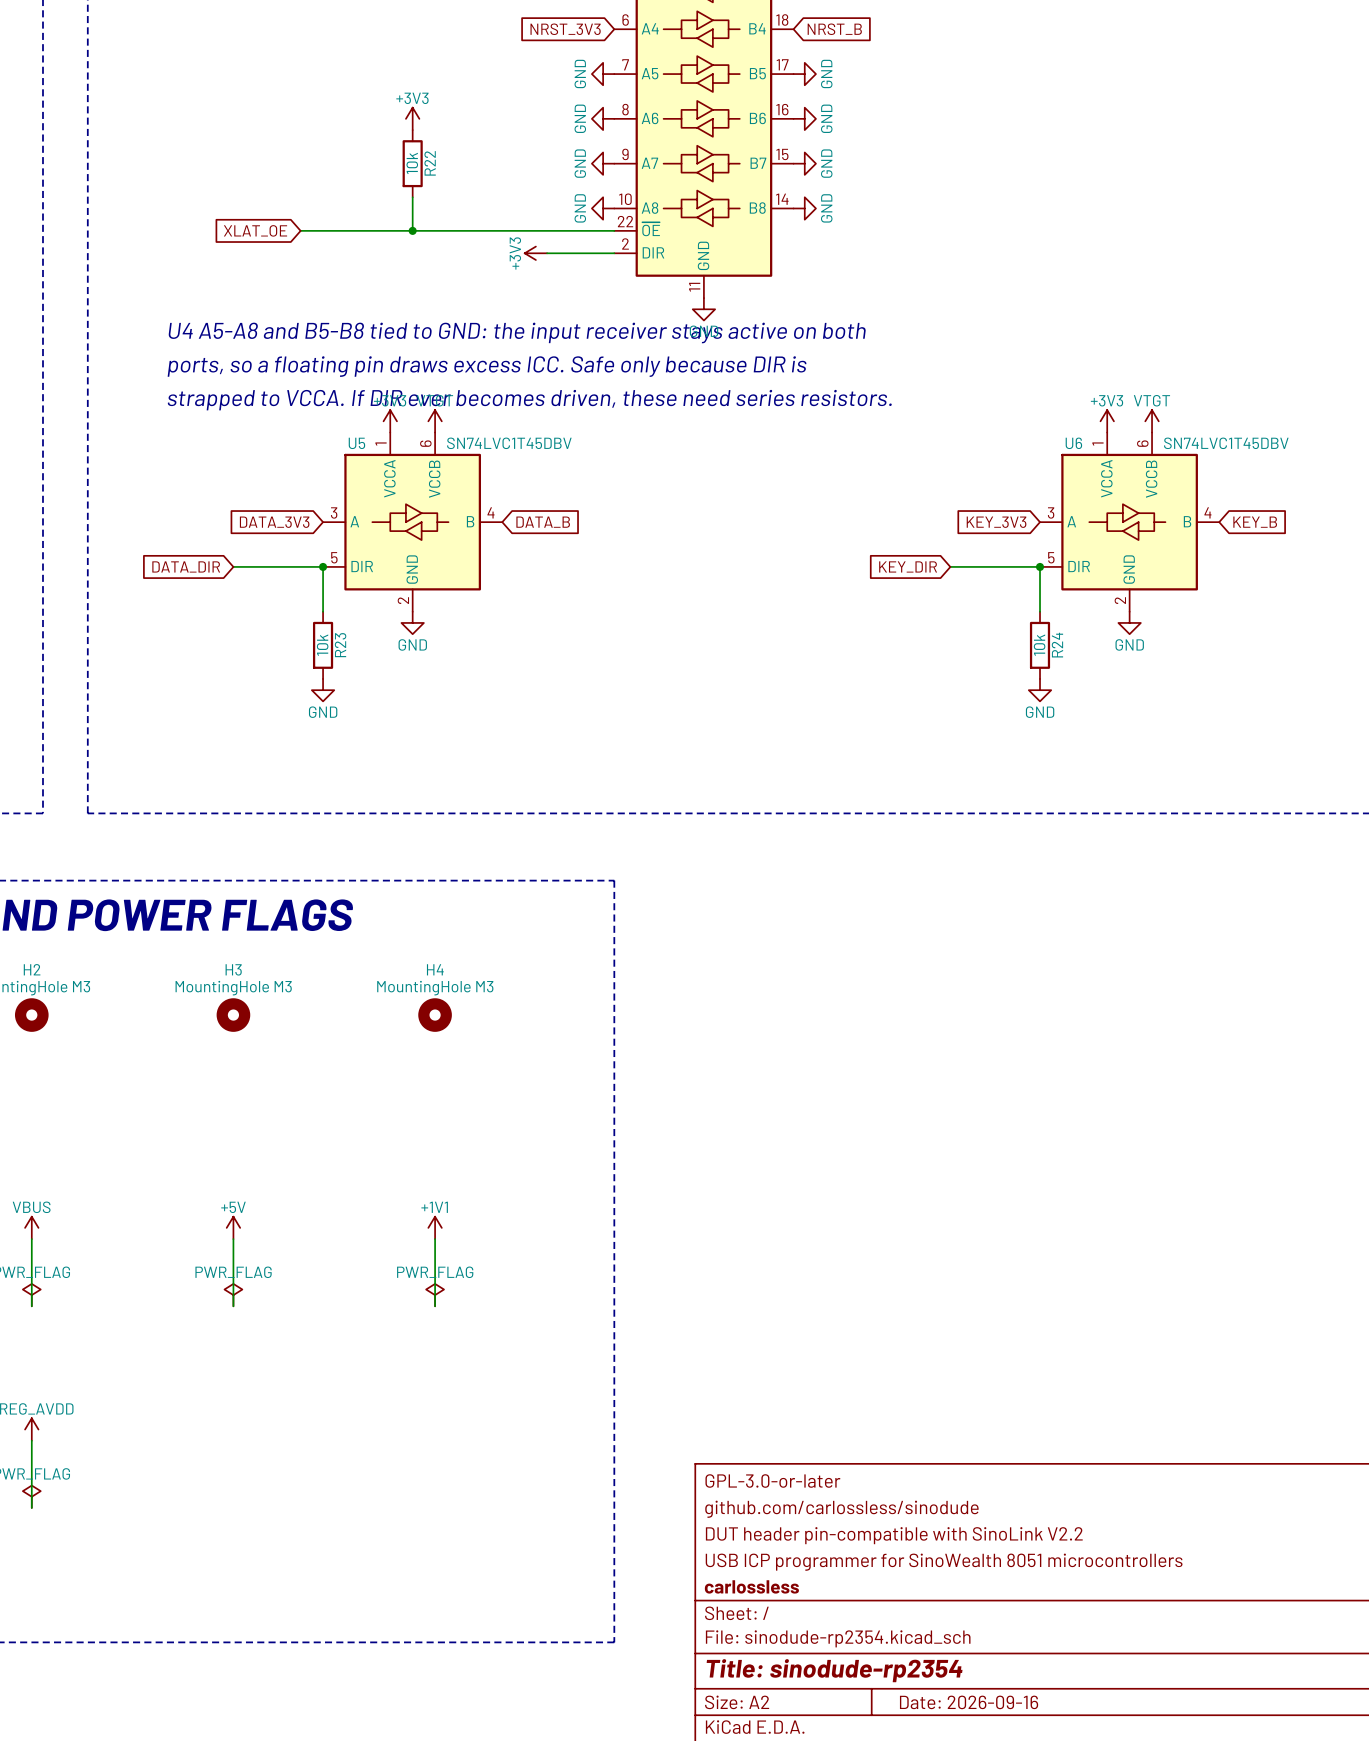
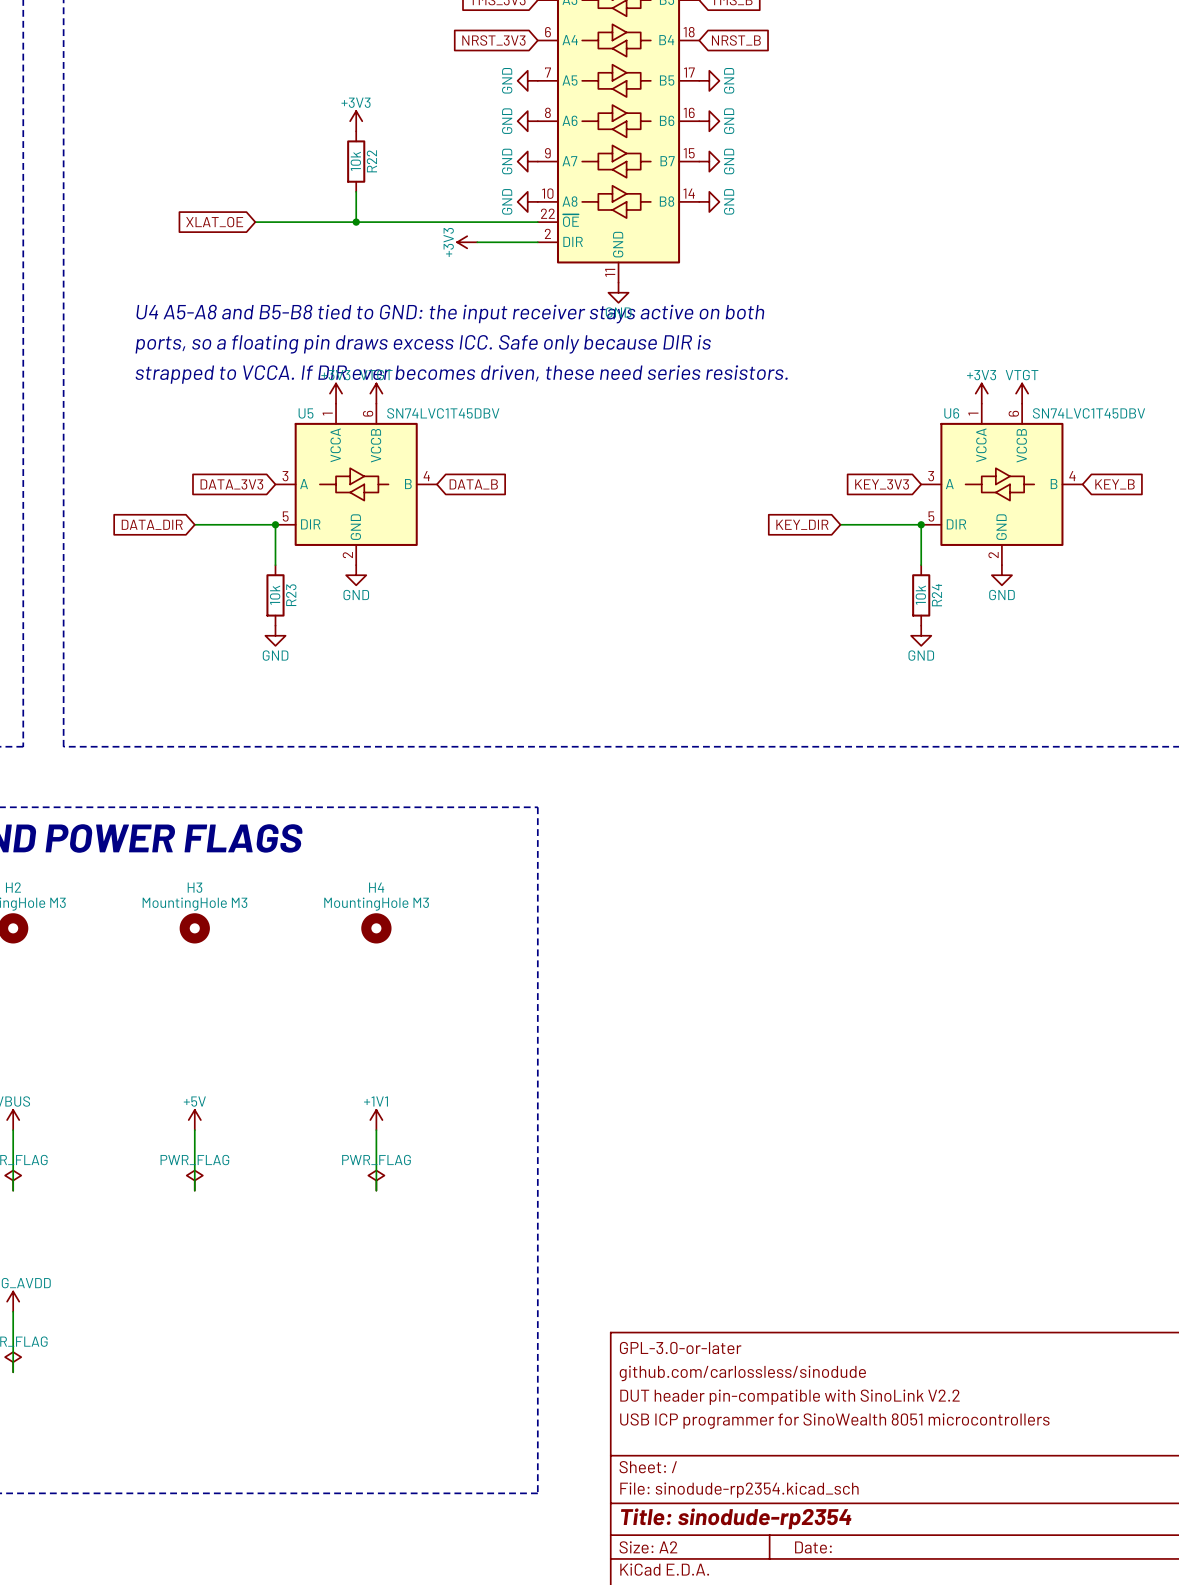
title block: carlossless (751, 1586) -> none
title block: Date: 2026-09-16 (969, 1702) -> Date: (813, 1547)

